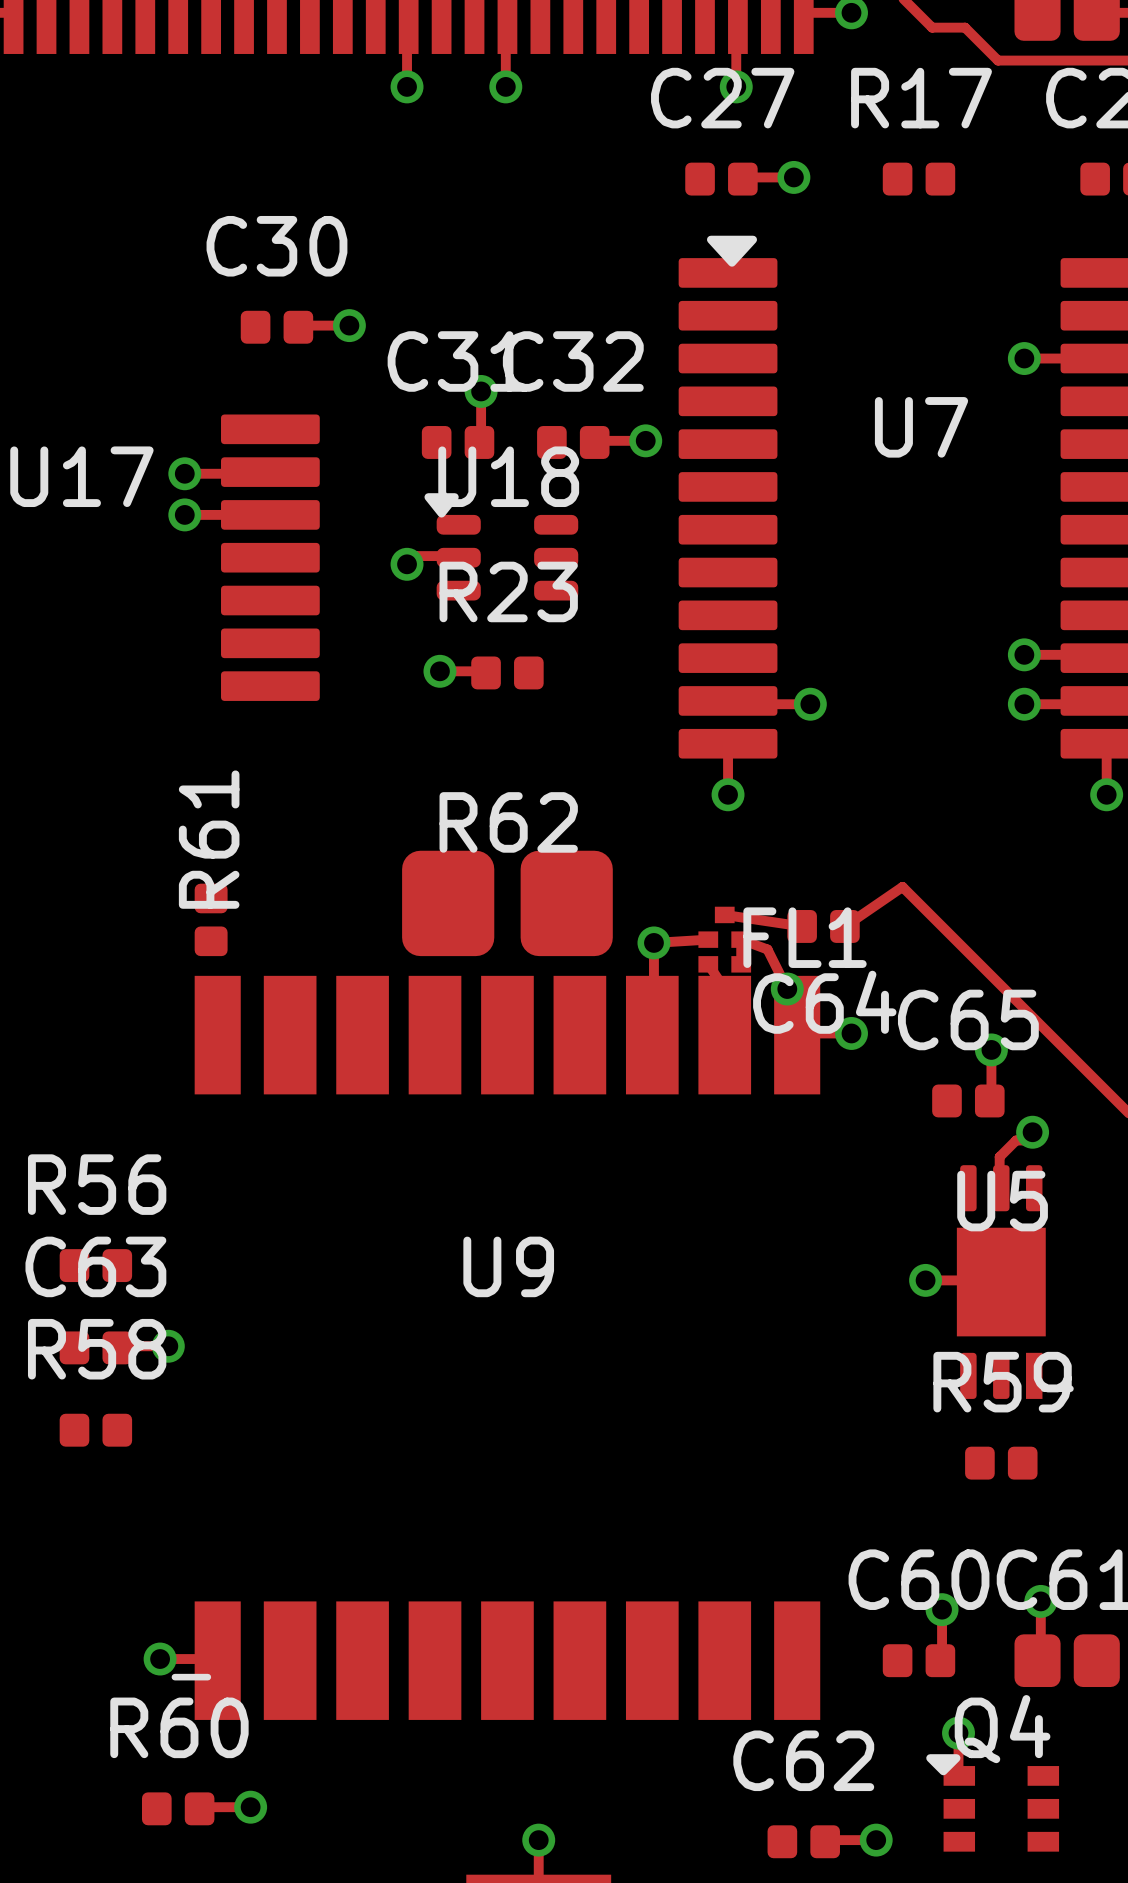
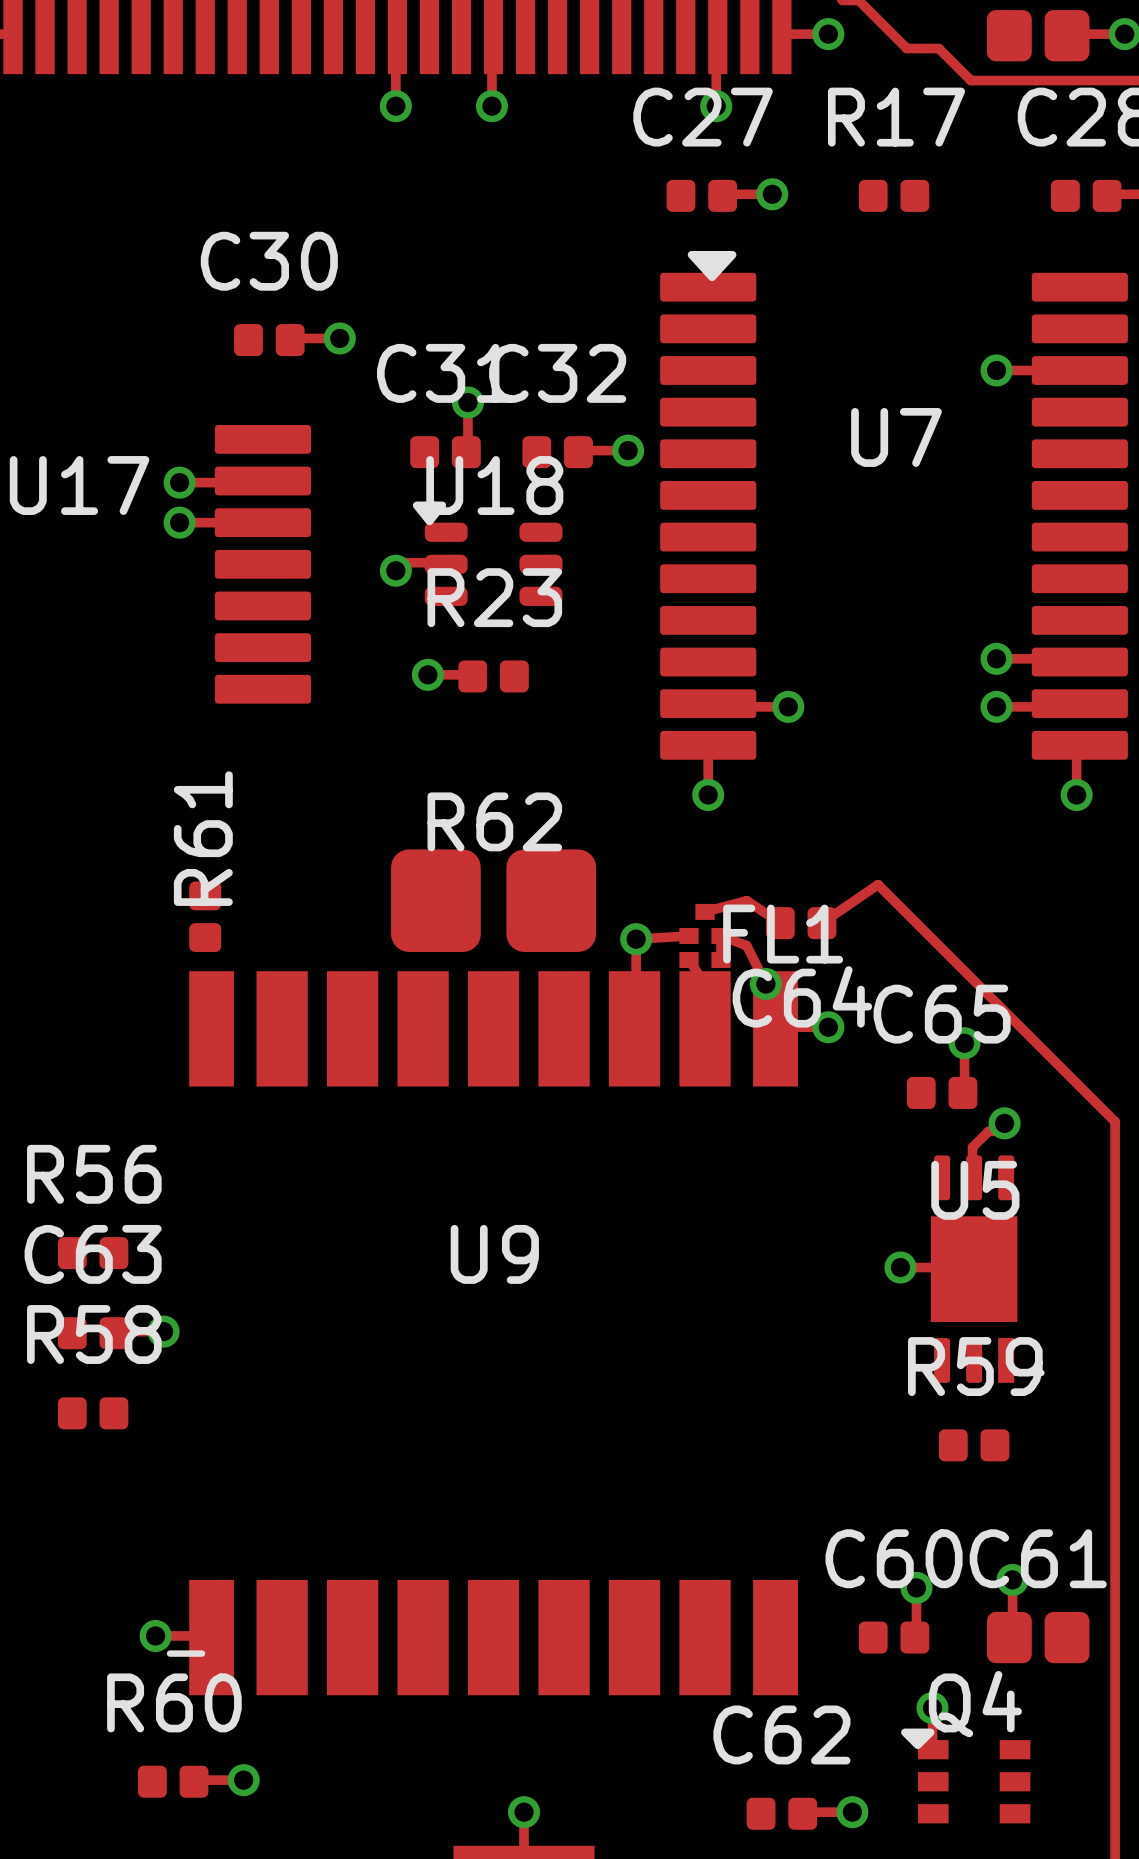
track: (724, 914) (802, 926) -> (705, 911) (746, 900) (780, 923)

